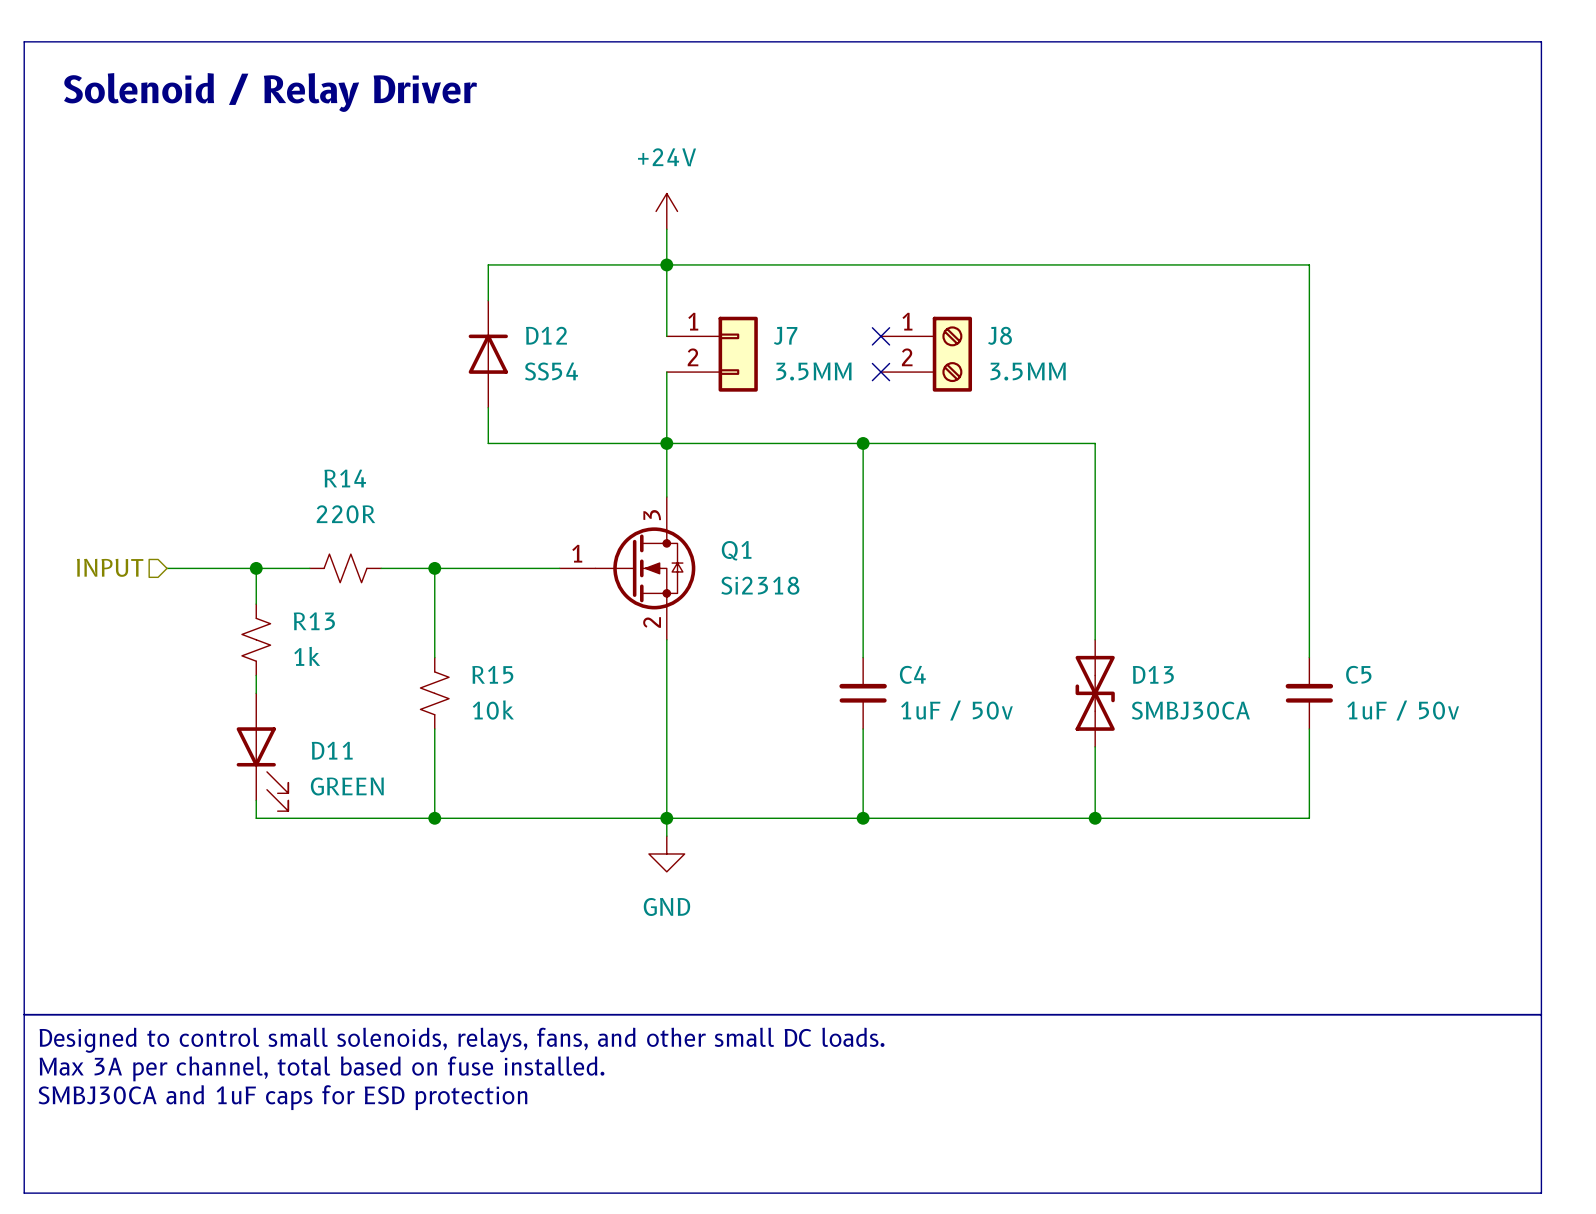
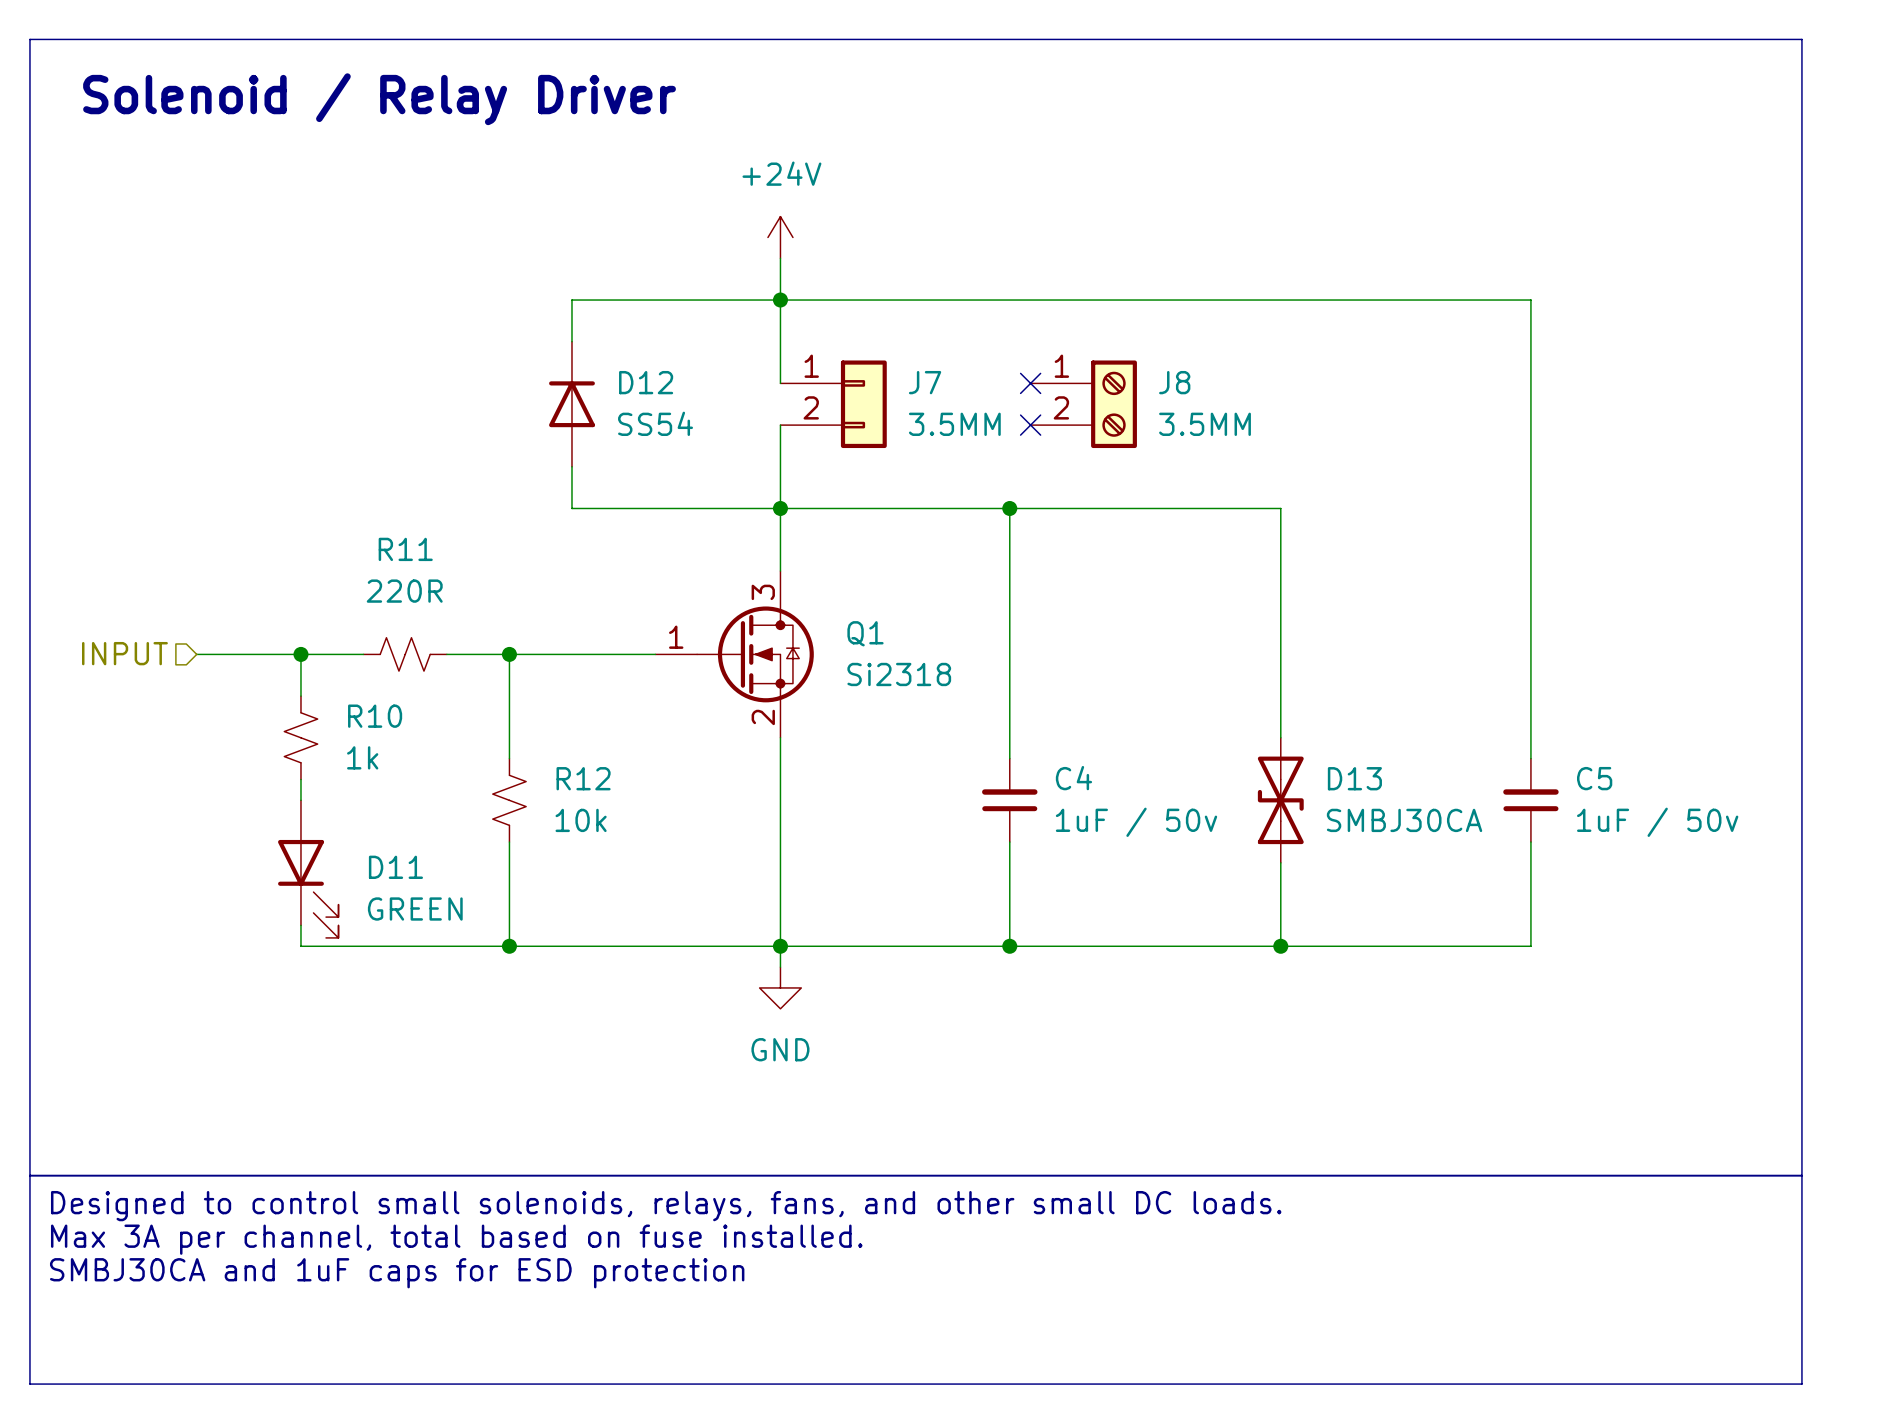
R14 name: R14 (345, 478) -> R11 (405, 549)
R13 name: R13 (314, 621) -> R10 (375, 716)
R15 name: R15 (492, 674) -> R12 (583, 778)

